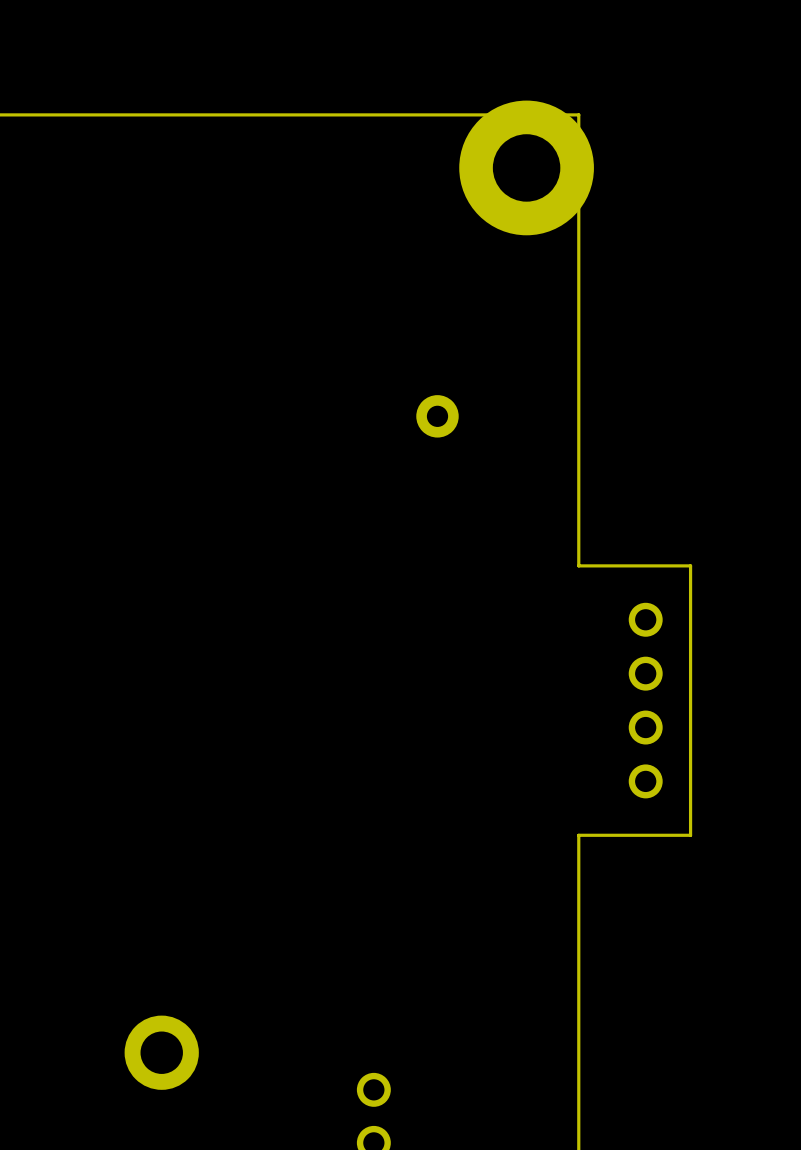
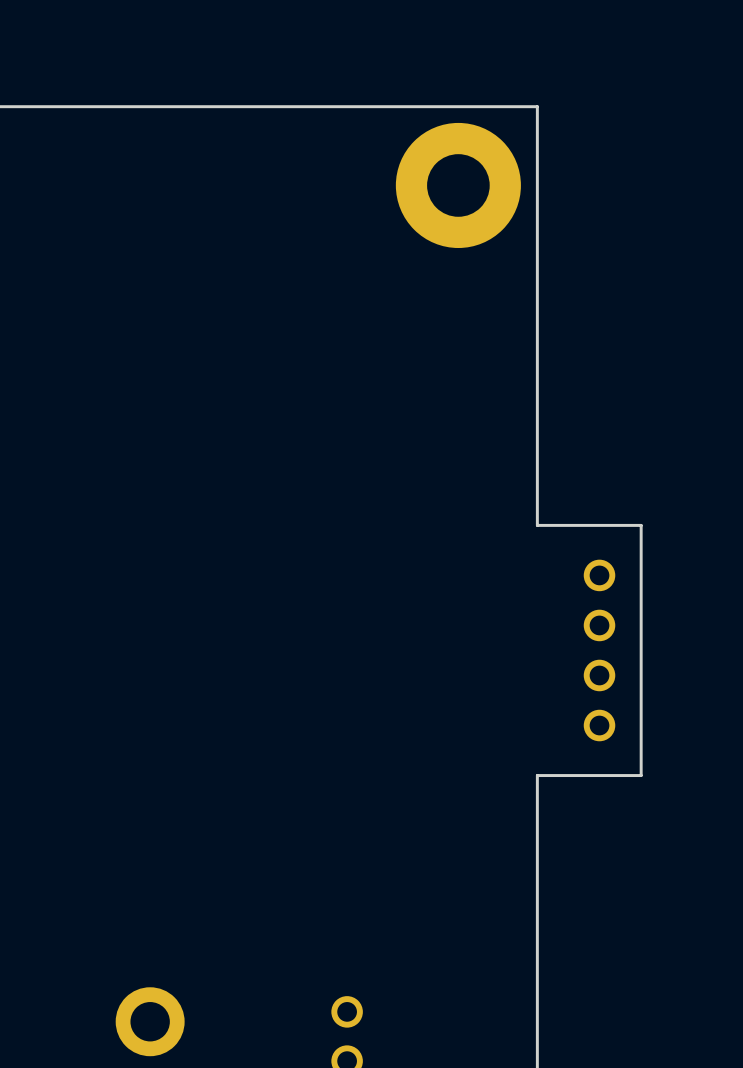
part position: (526, 167) -> (458, 185)
part: (437, 416) -> none
part position: (161, 1052) -> (150, 1021)

